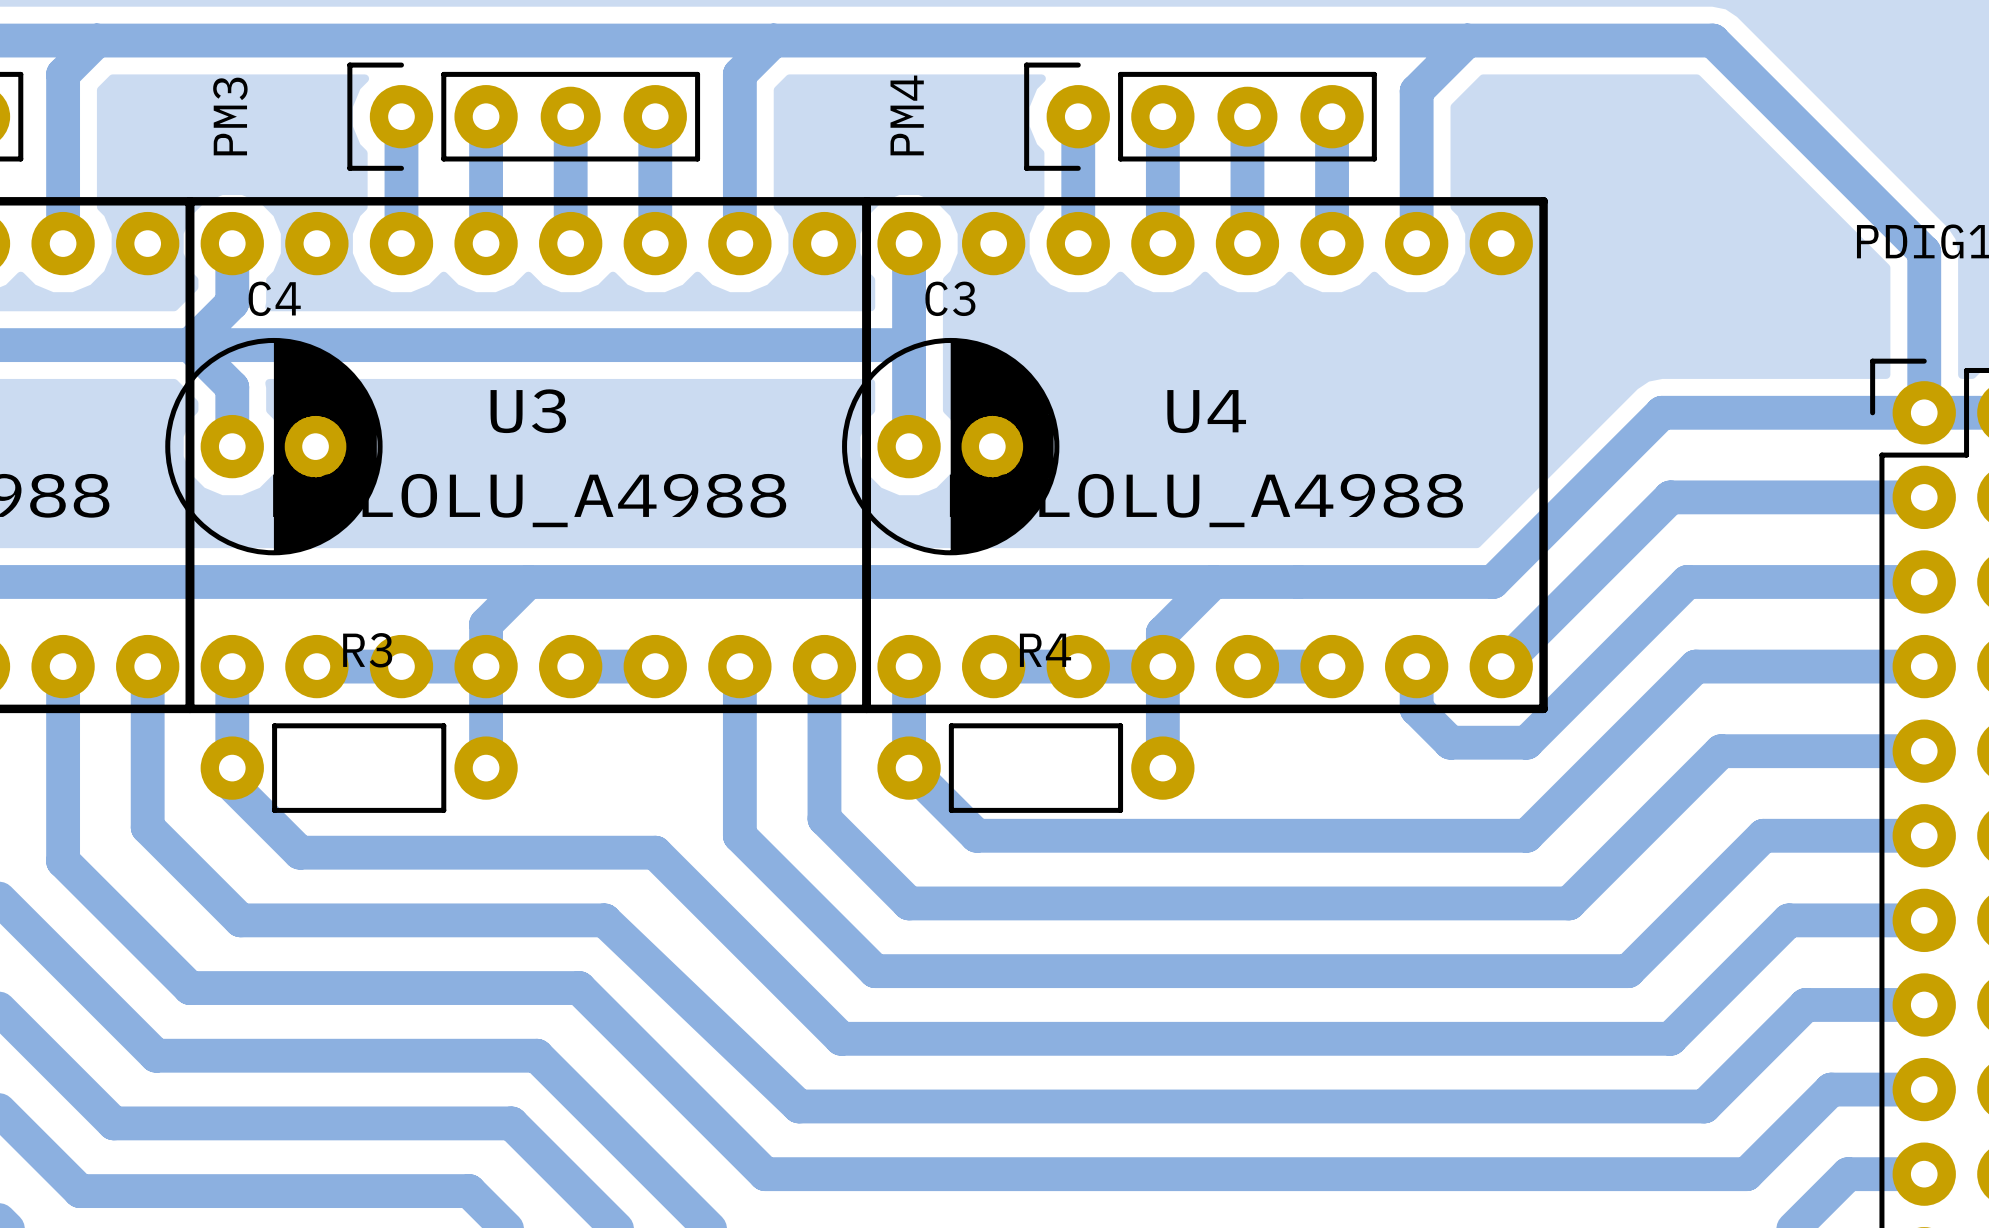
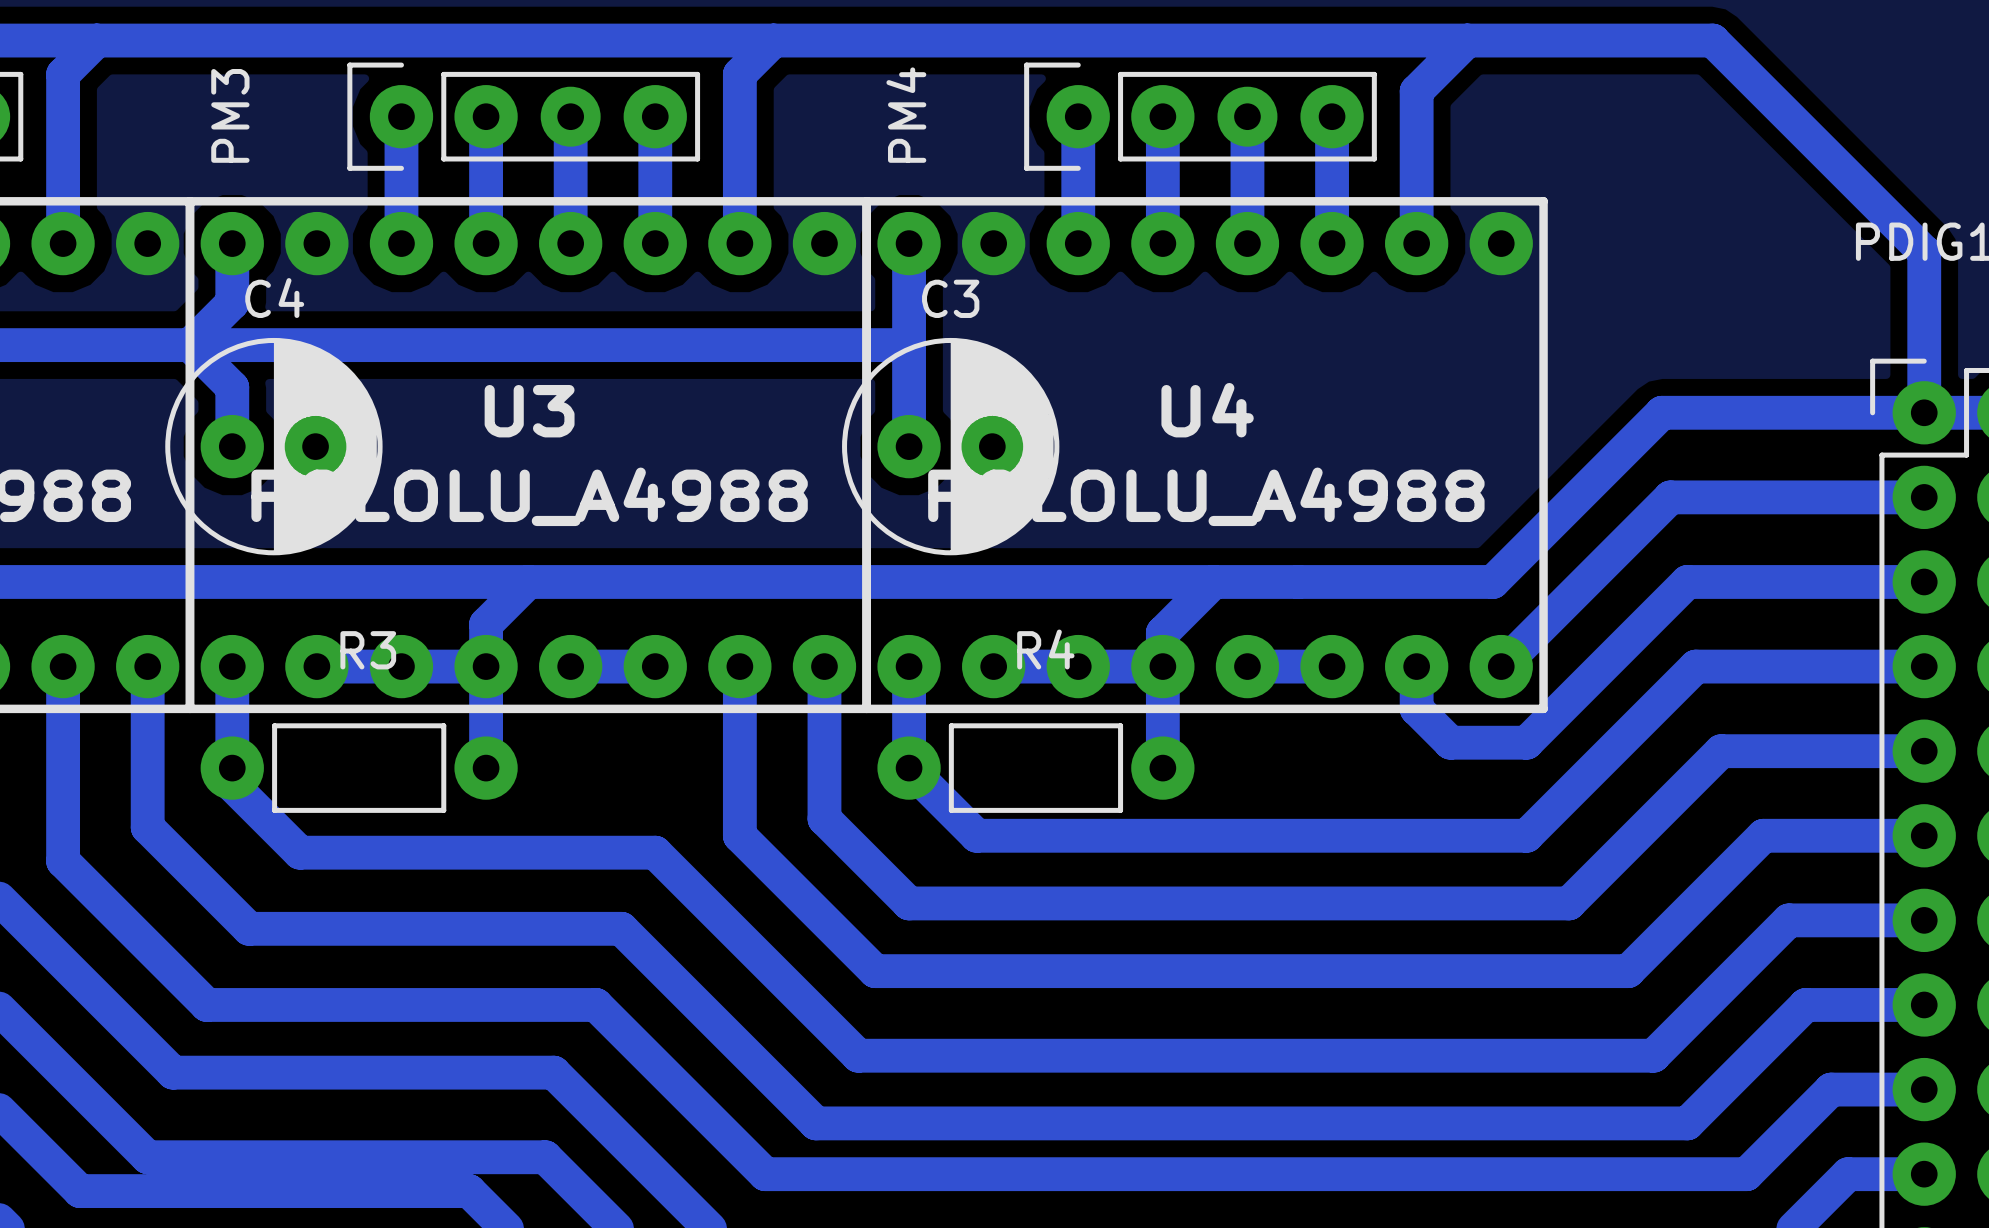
bottom track: (240, 920) (604, 920) (799, 1106) (1704, 1106) -> (240, 920) (249, 928) (621, 928) (816, 1123) (1687, 1123) (1704, 1106)
bottom track: (189, 988) (579, 988) (596, 1004) -> (189, 988) (206, 1004) (596, 1004)
bottom track: (841, 1038) (1670, 1038) -> (841, 1038) (858, 1055) (1653, 1055) (1670, 1038)
bottom track: (156, 1055) (536, 1055) (553, 1072) -> (156, 1055) (173, 1072) (553, 1072)
bottom track: (113, 1123) (511, 1123) (545, 1157) -> (113, 1123) (147, 1157) (545, 1157)

